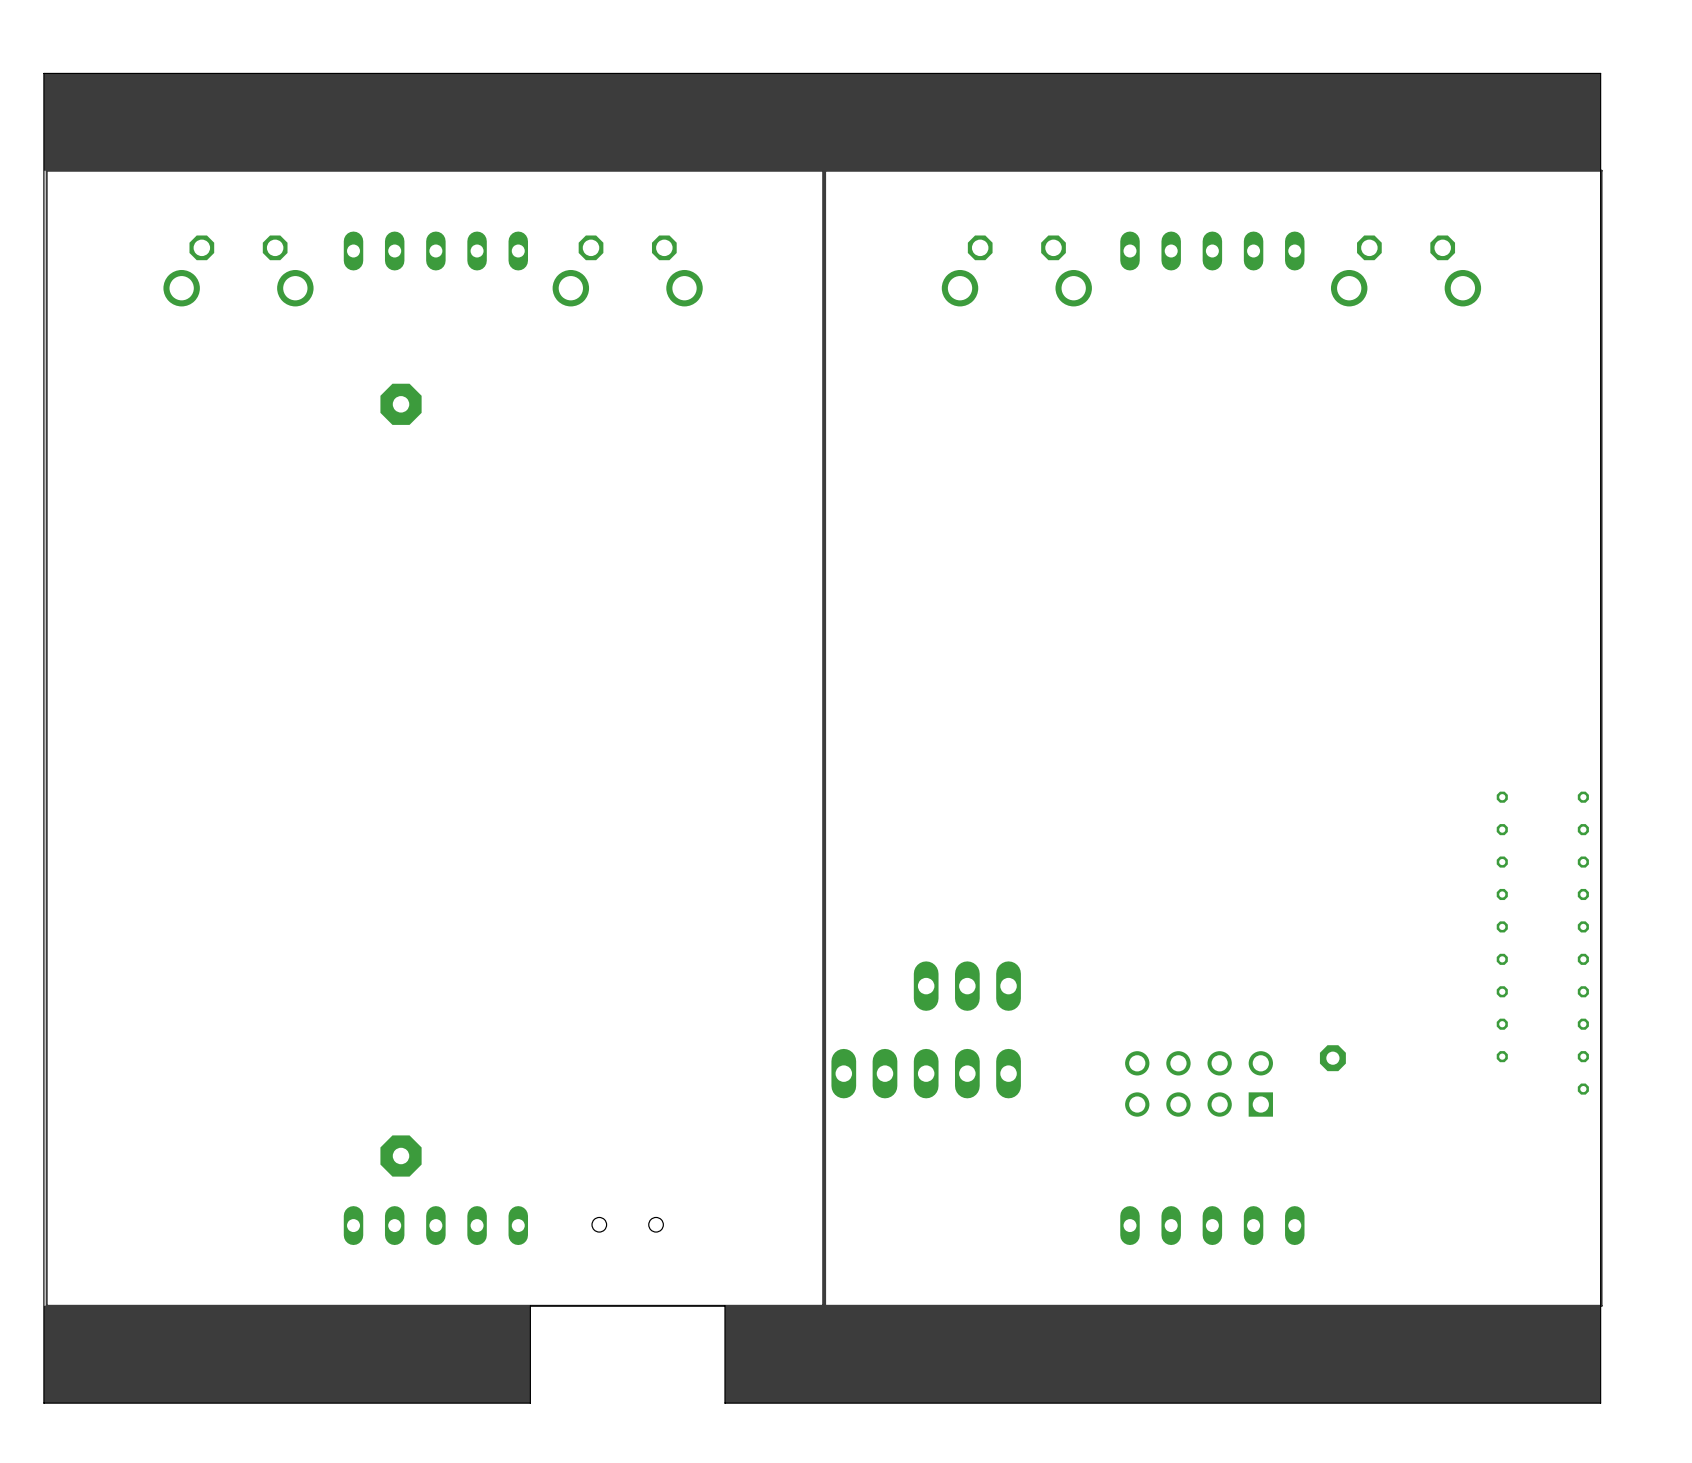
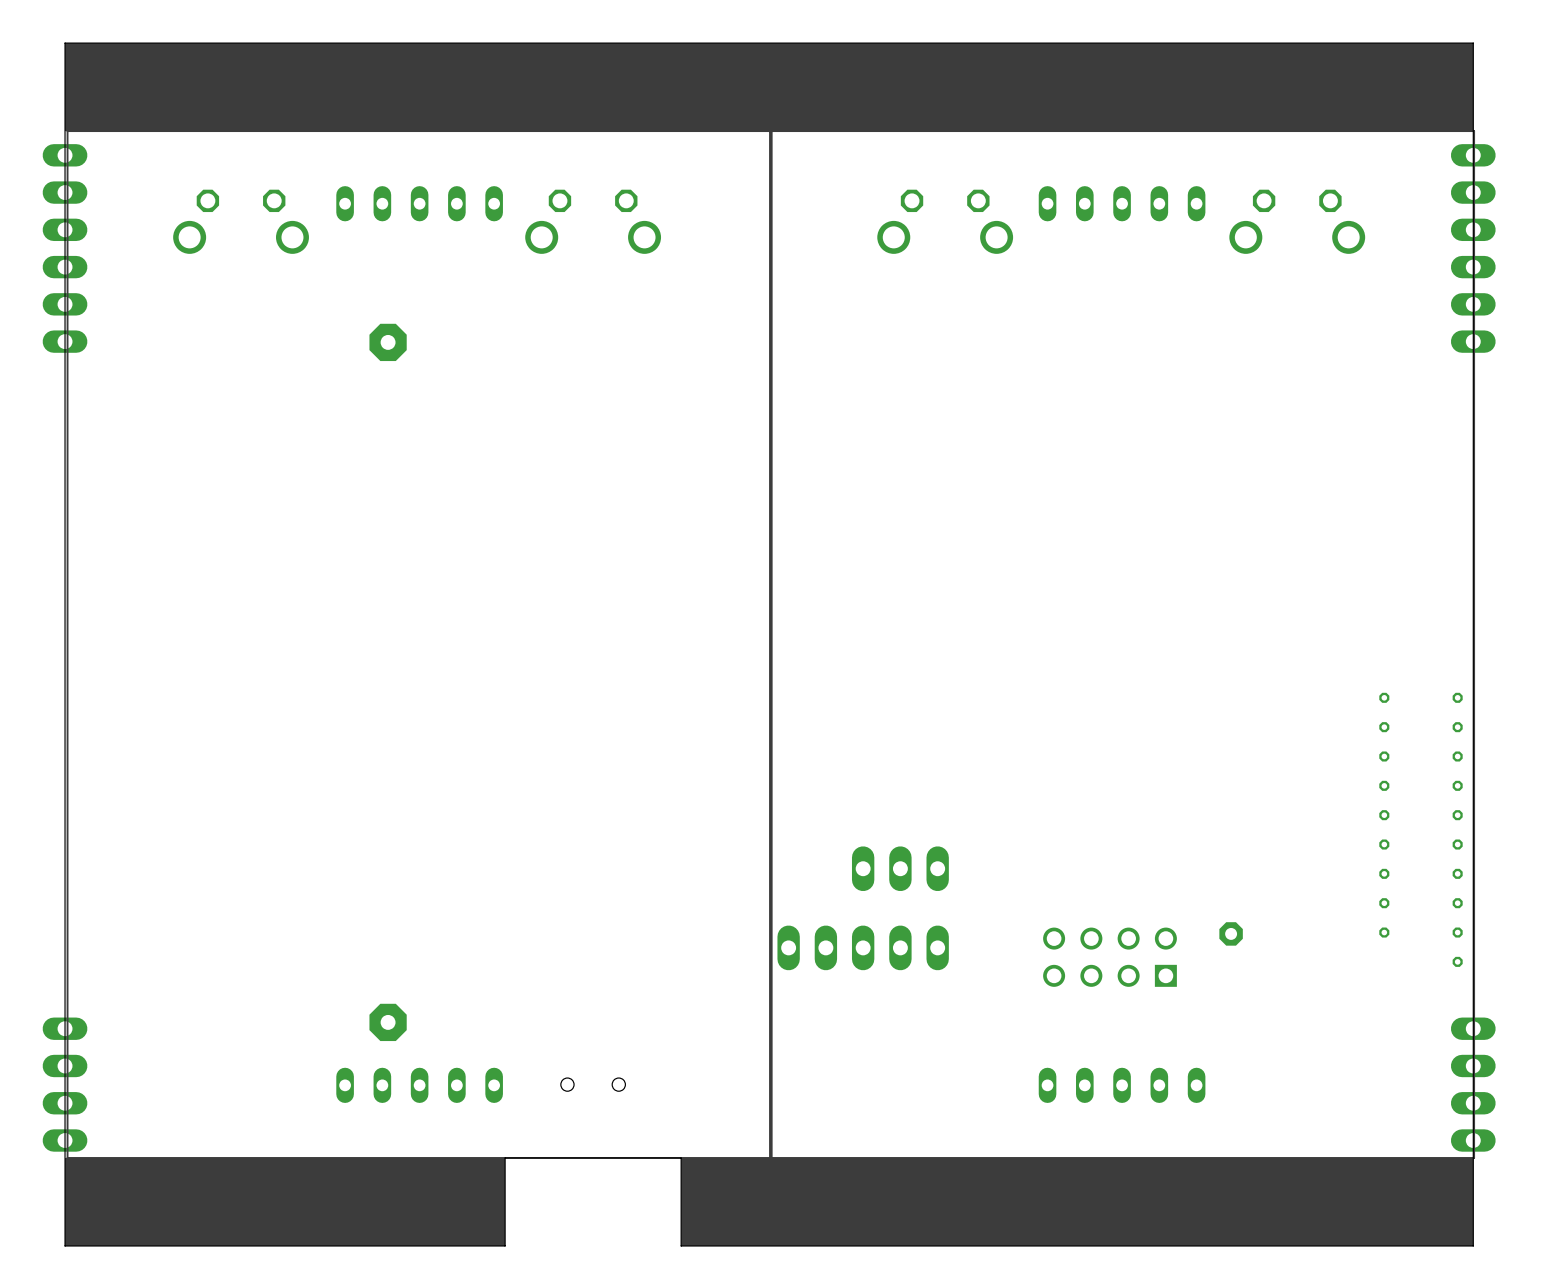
part: none -> (65, 248)
part: none -> (1473, 248)
part: none -> (65, 1084)
part: none -> (1473, 1084)

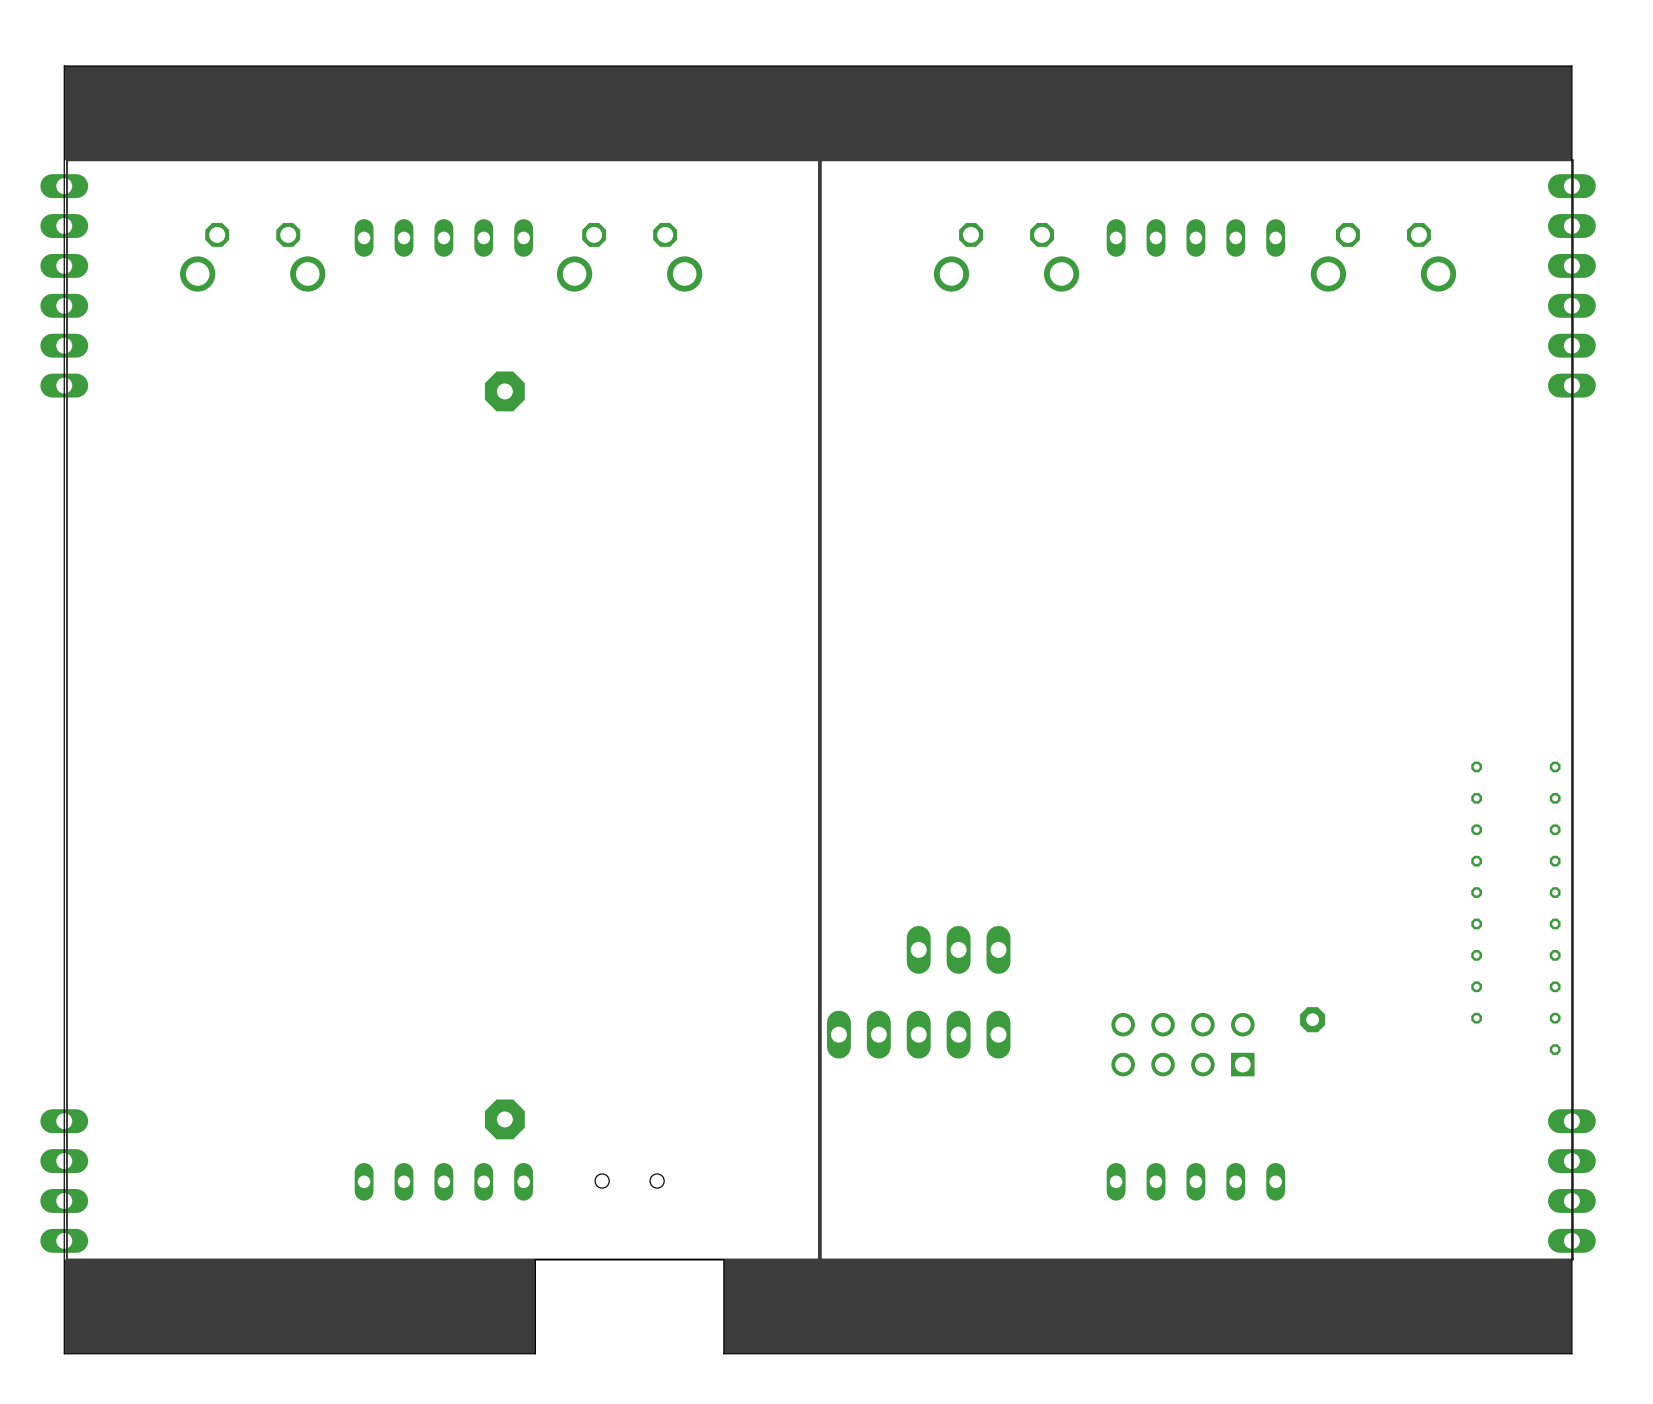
part position: (388, 342) -> (504, 391)
part position: (388, 1022) -> (504, 1119)

